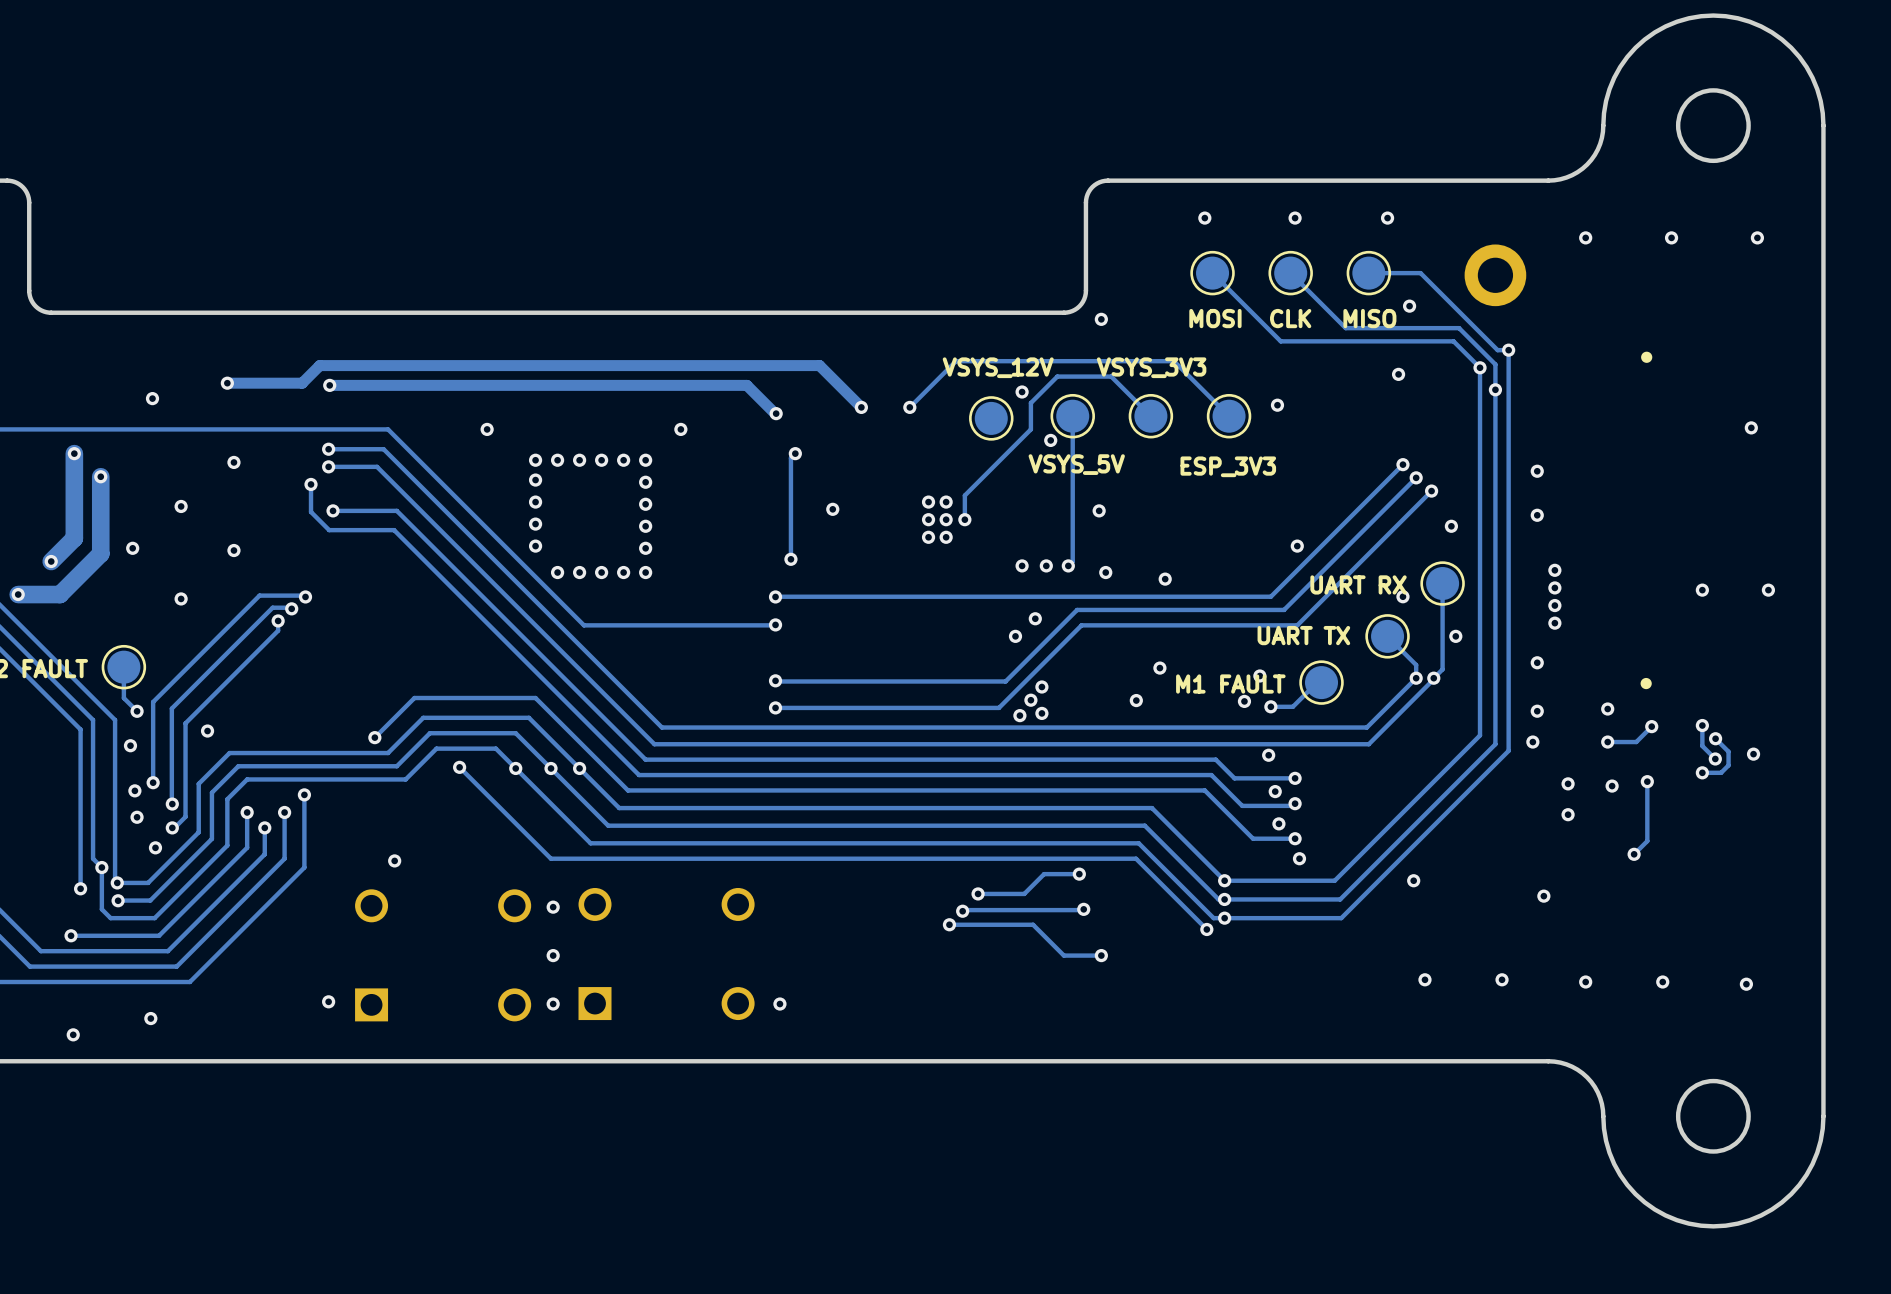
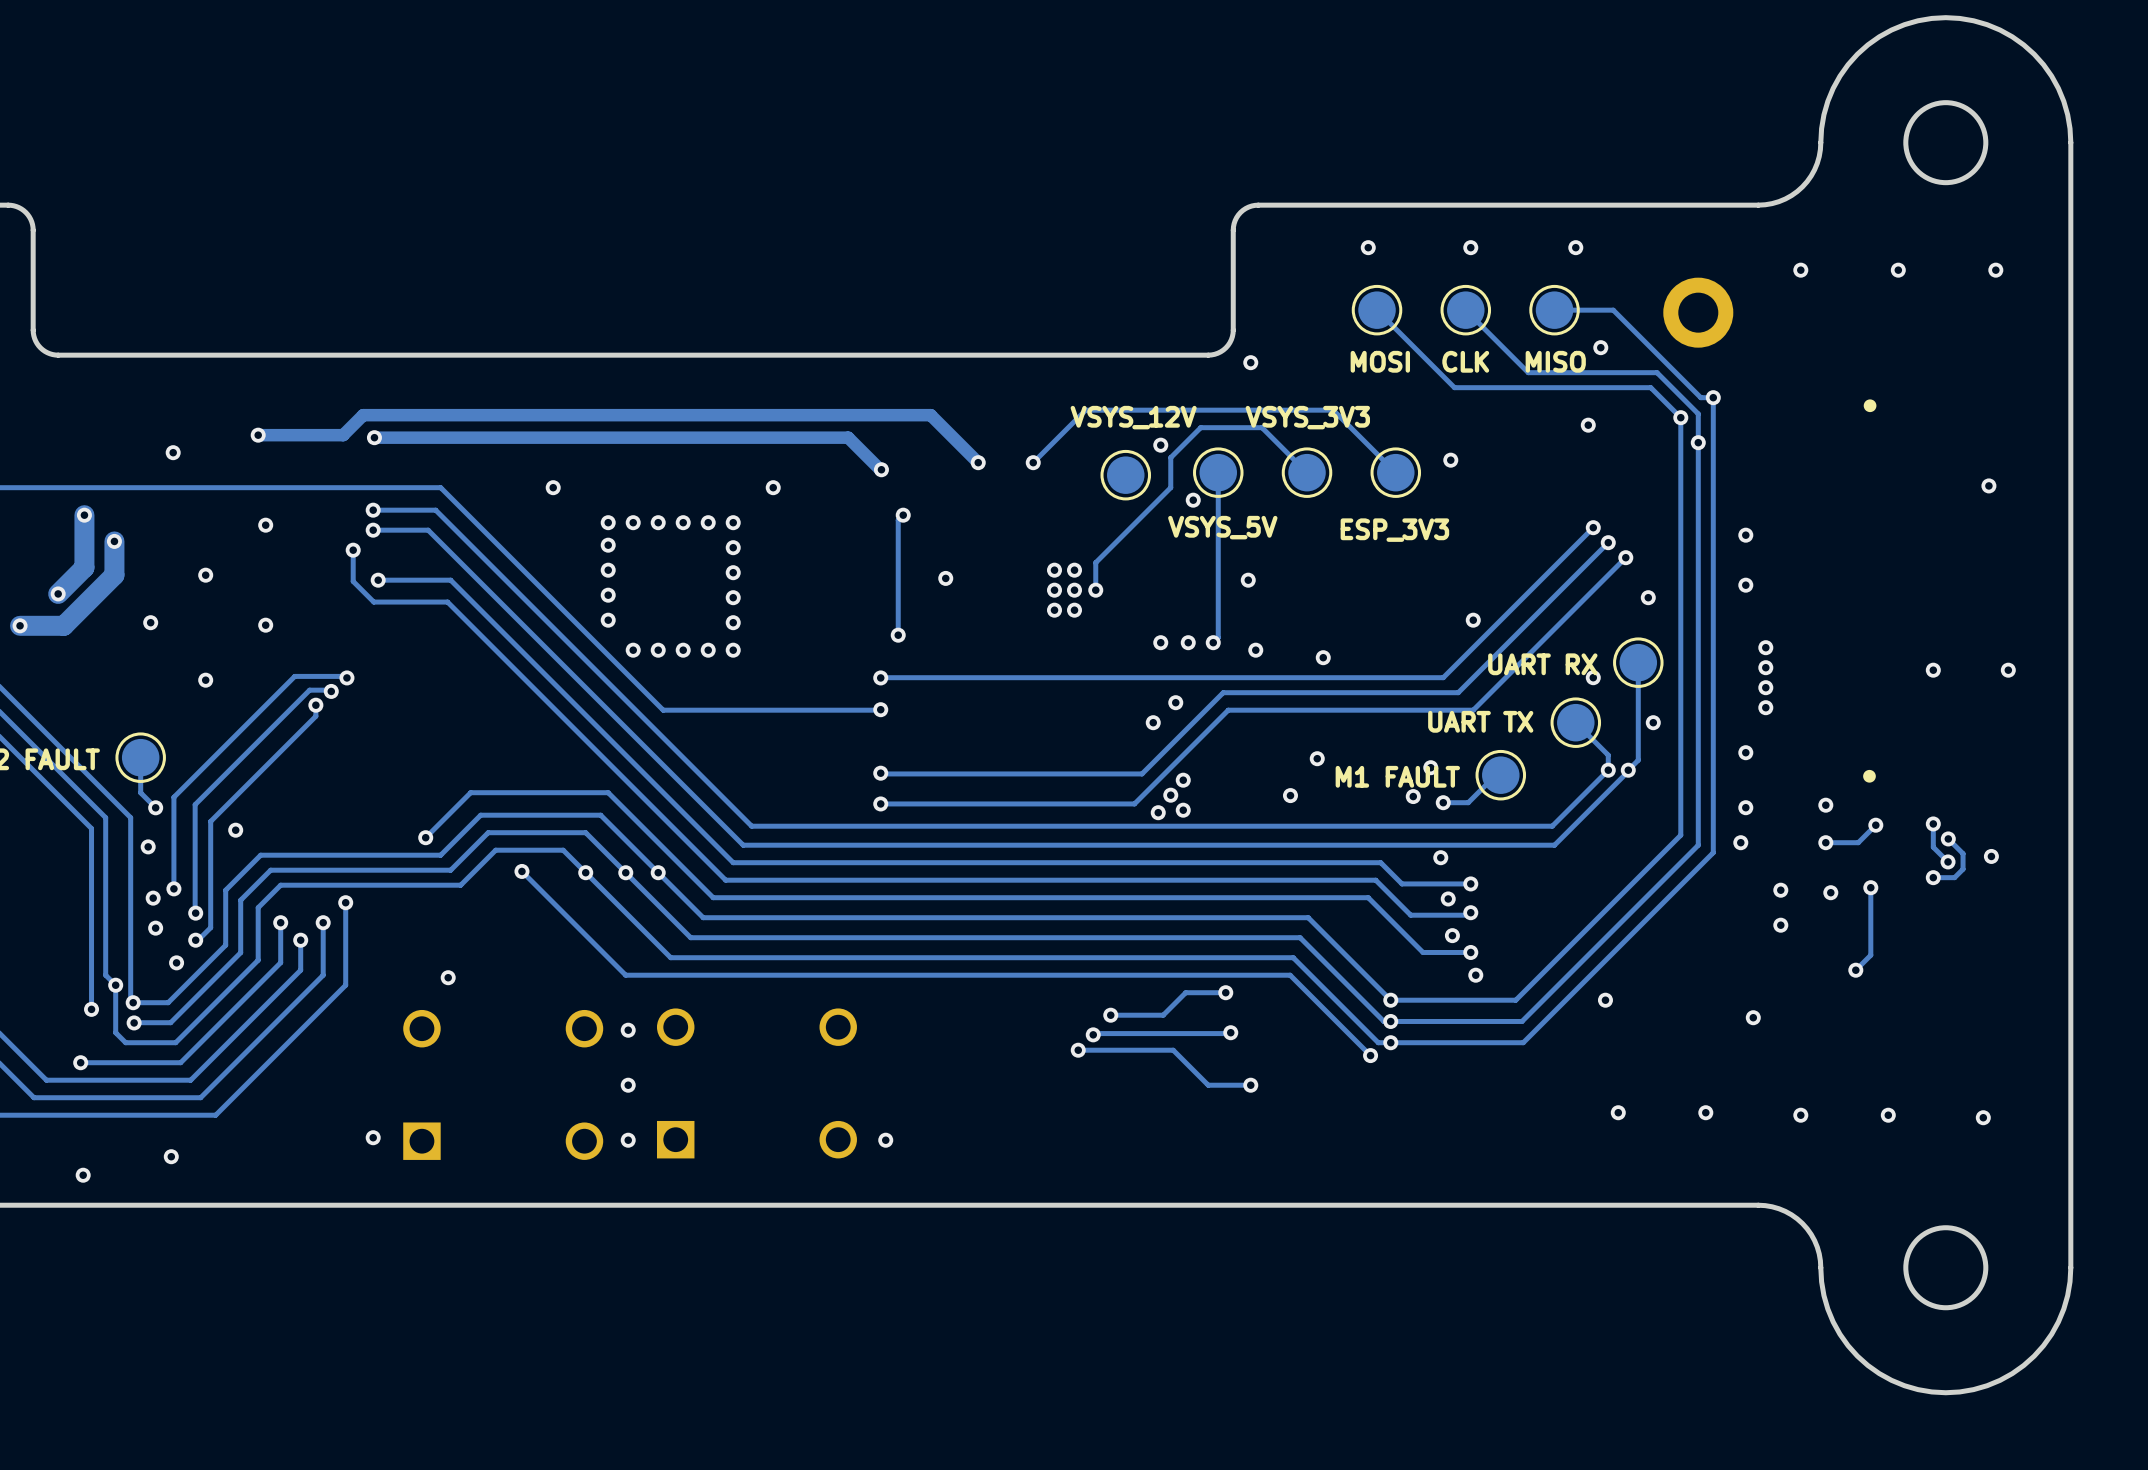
track: (74, 499) (74, 538) (51, 561) -> (84, 567) (58, 593)
track: (100, 506) (100, 553) (60, 594) (18, 594) -> (114, 575) (63, 625) (20, 625)
via: none -> (58, 593)
via: none -> (20, 625)
via: (51, 561) -> none
via: (18, 594) -> none

